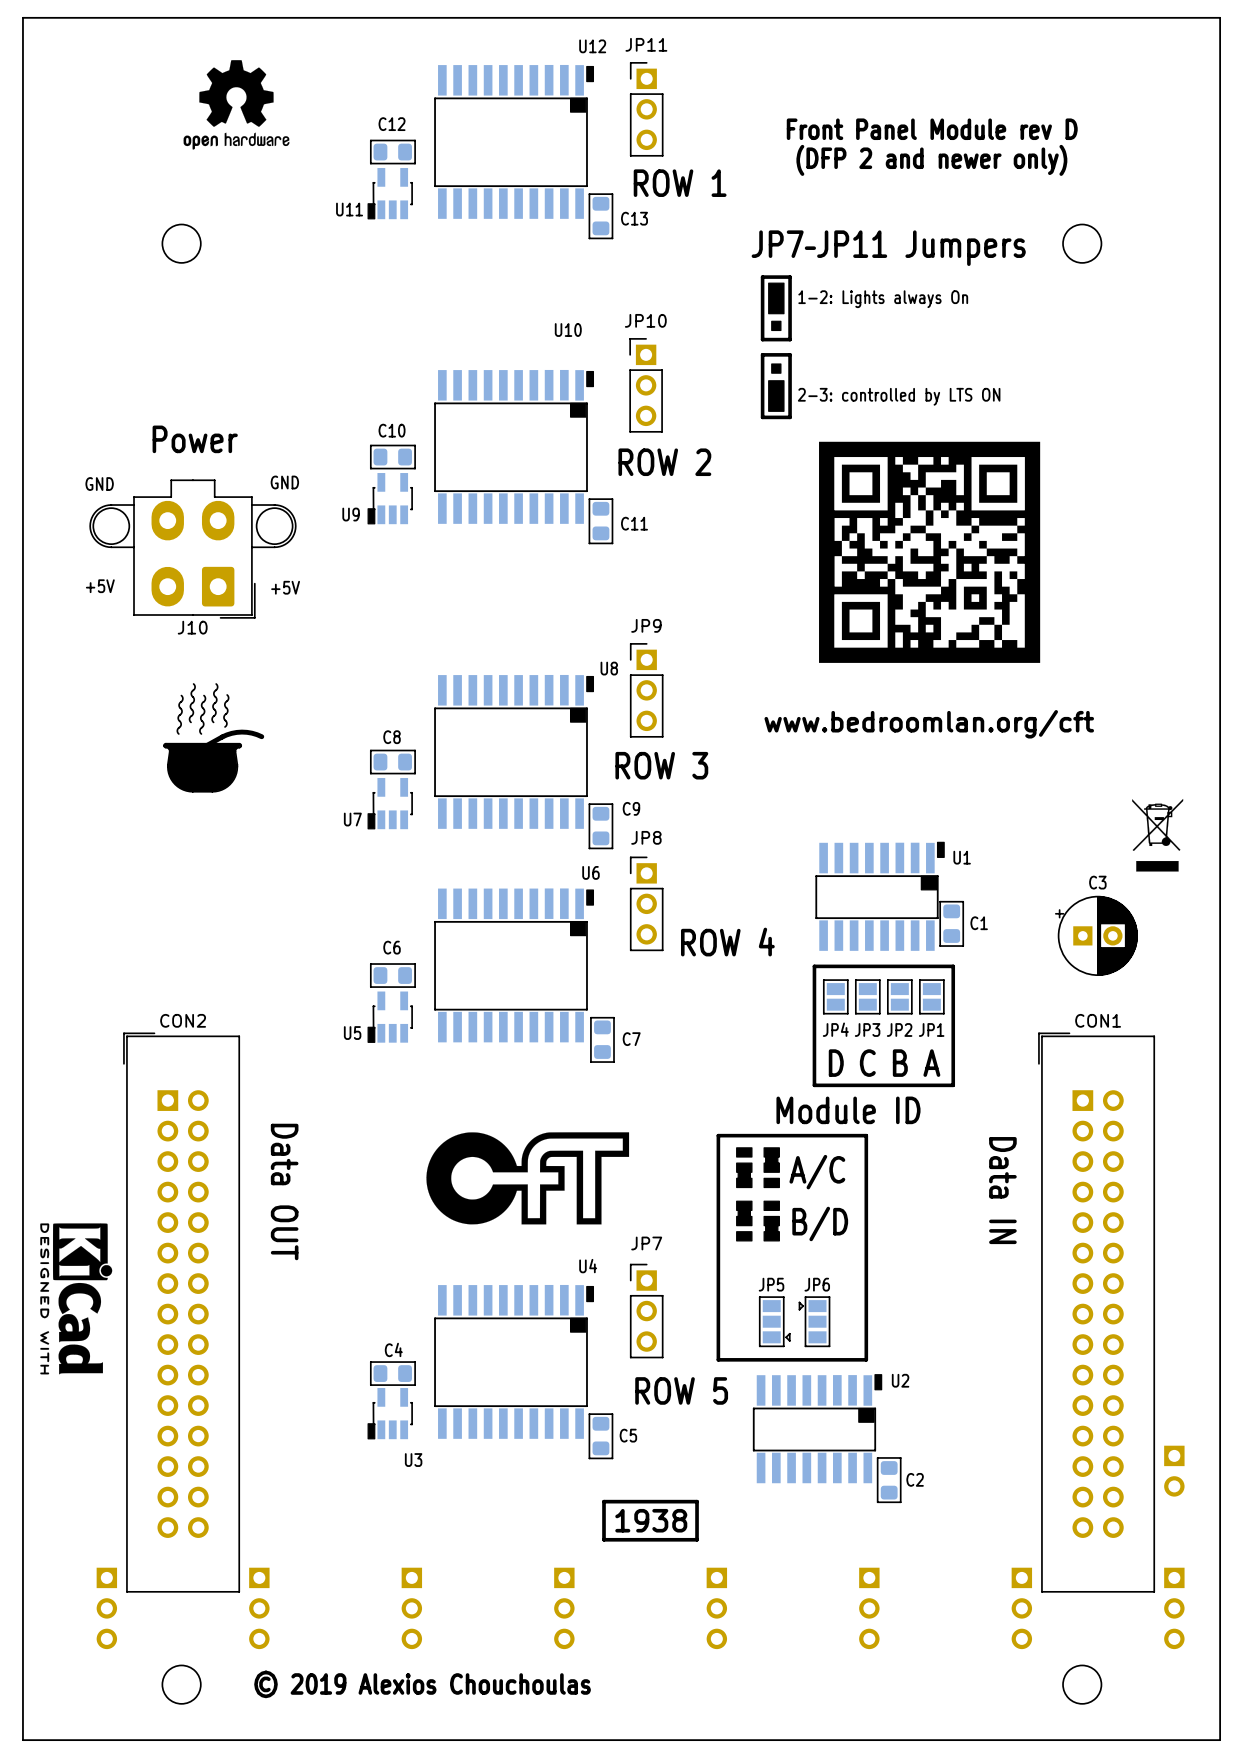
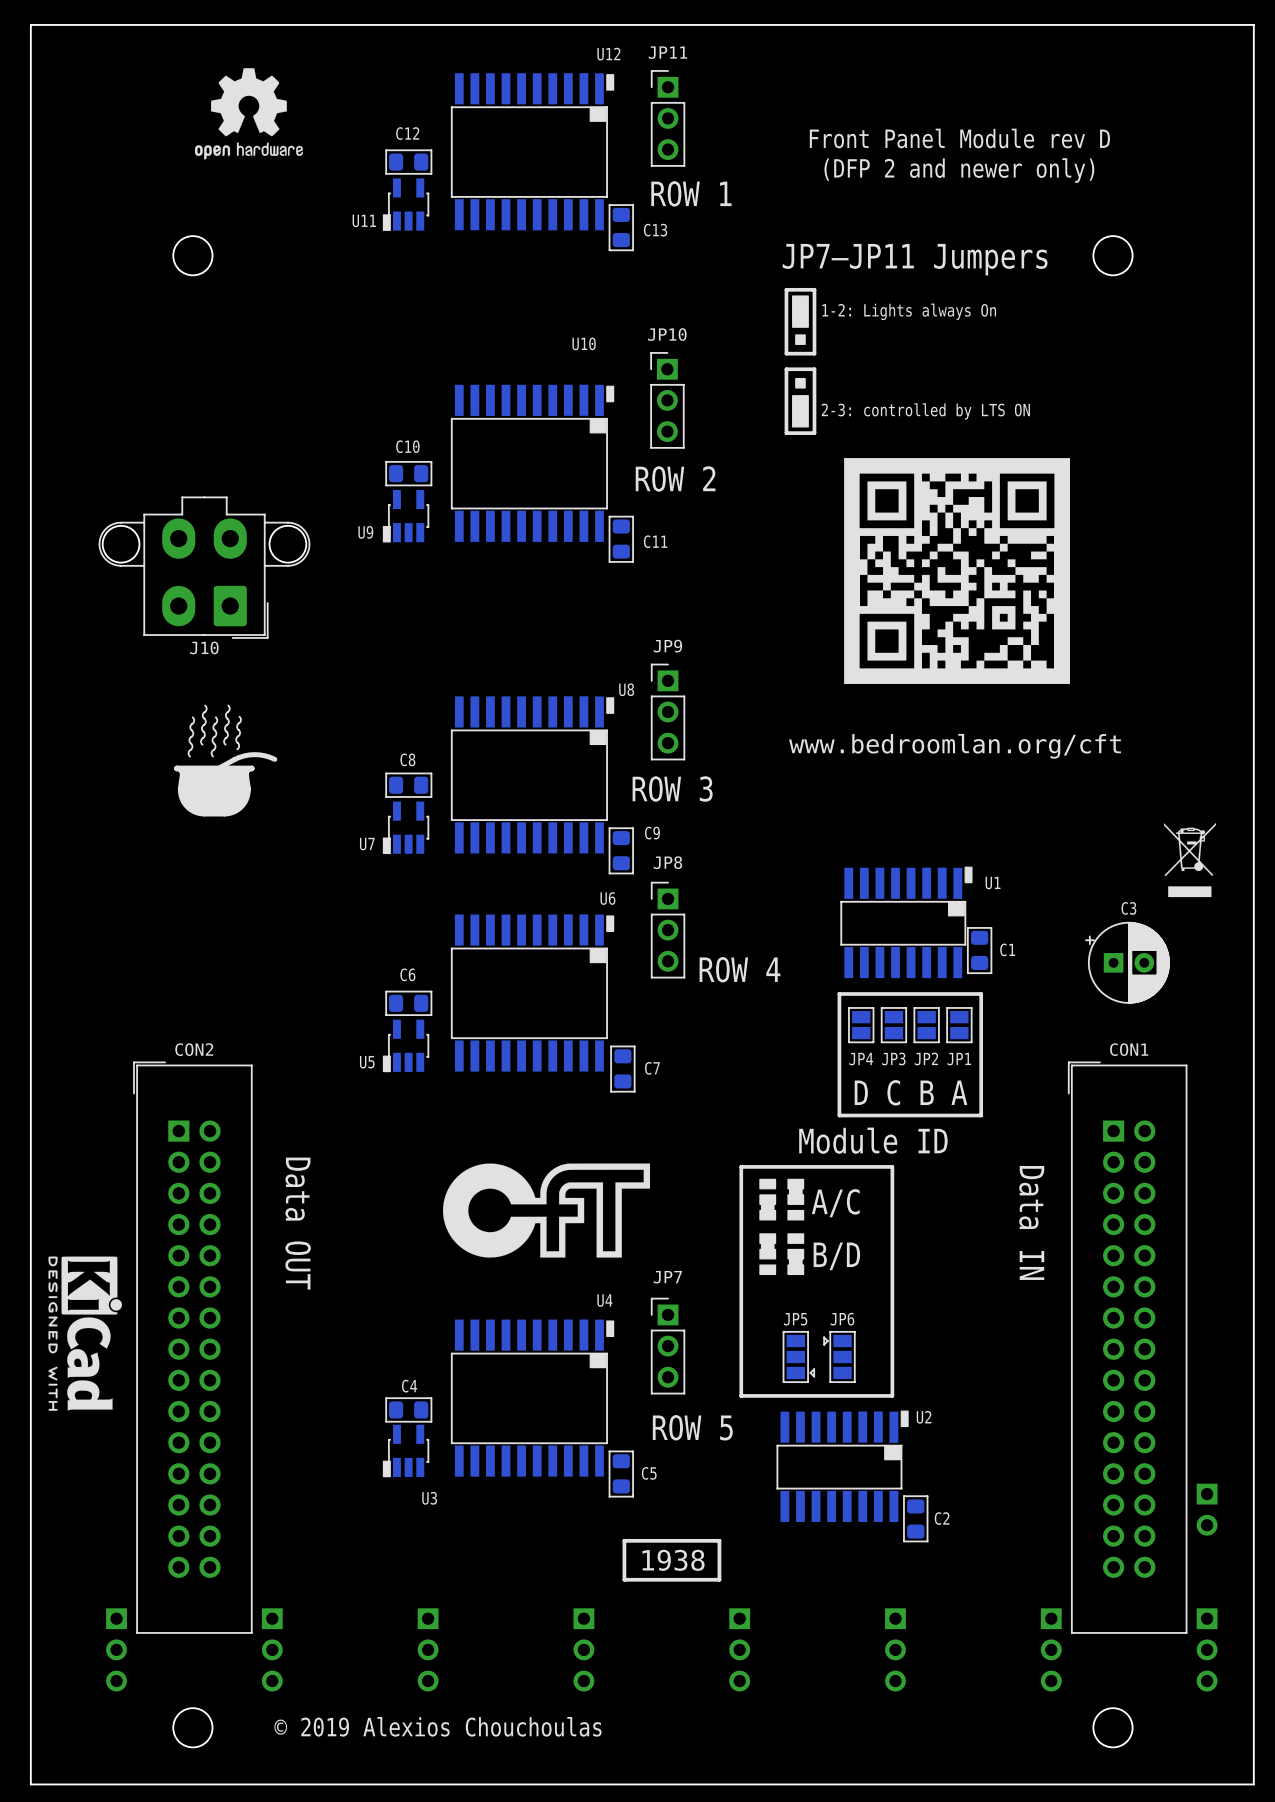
text: Power (195, 439) -> none
text: GND (284, 482) -> none
text: GND (99, 484) -> none
text: +5V (100, 586) -> none
text: +5V (285, 587) -> none

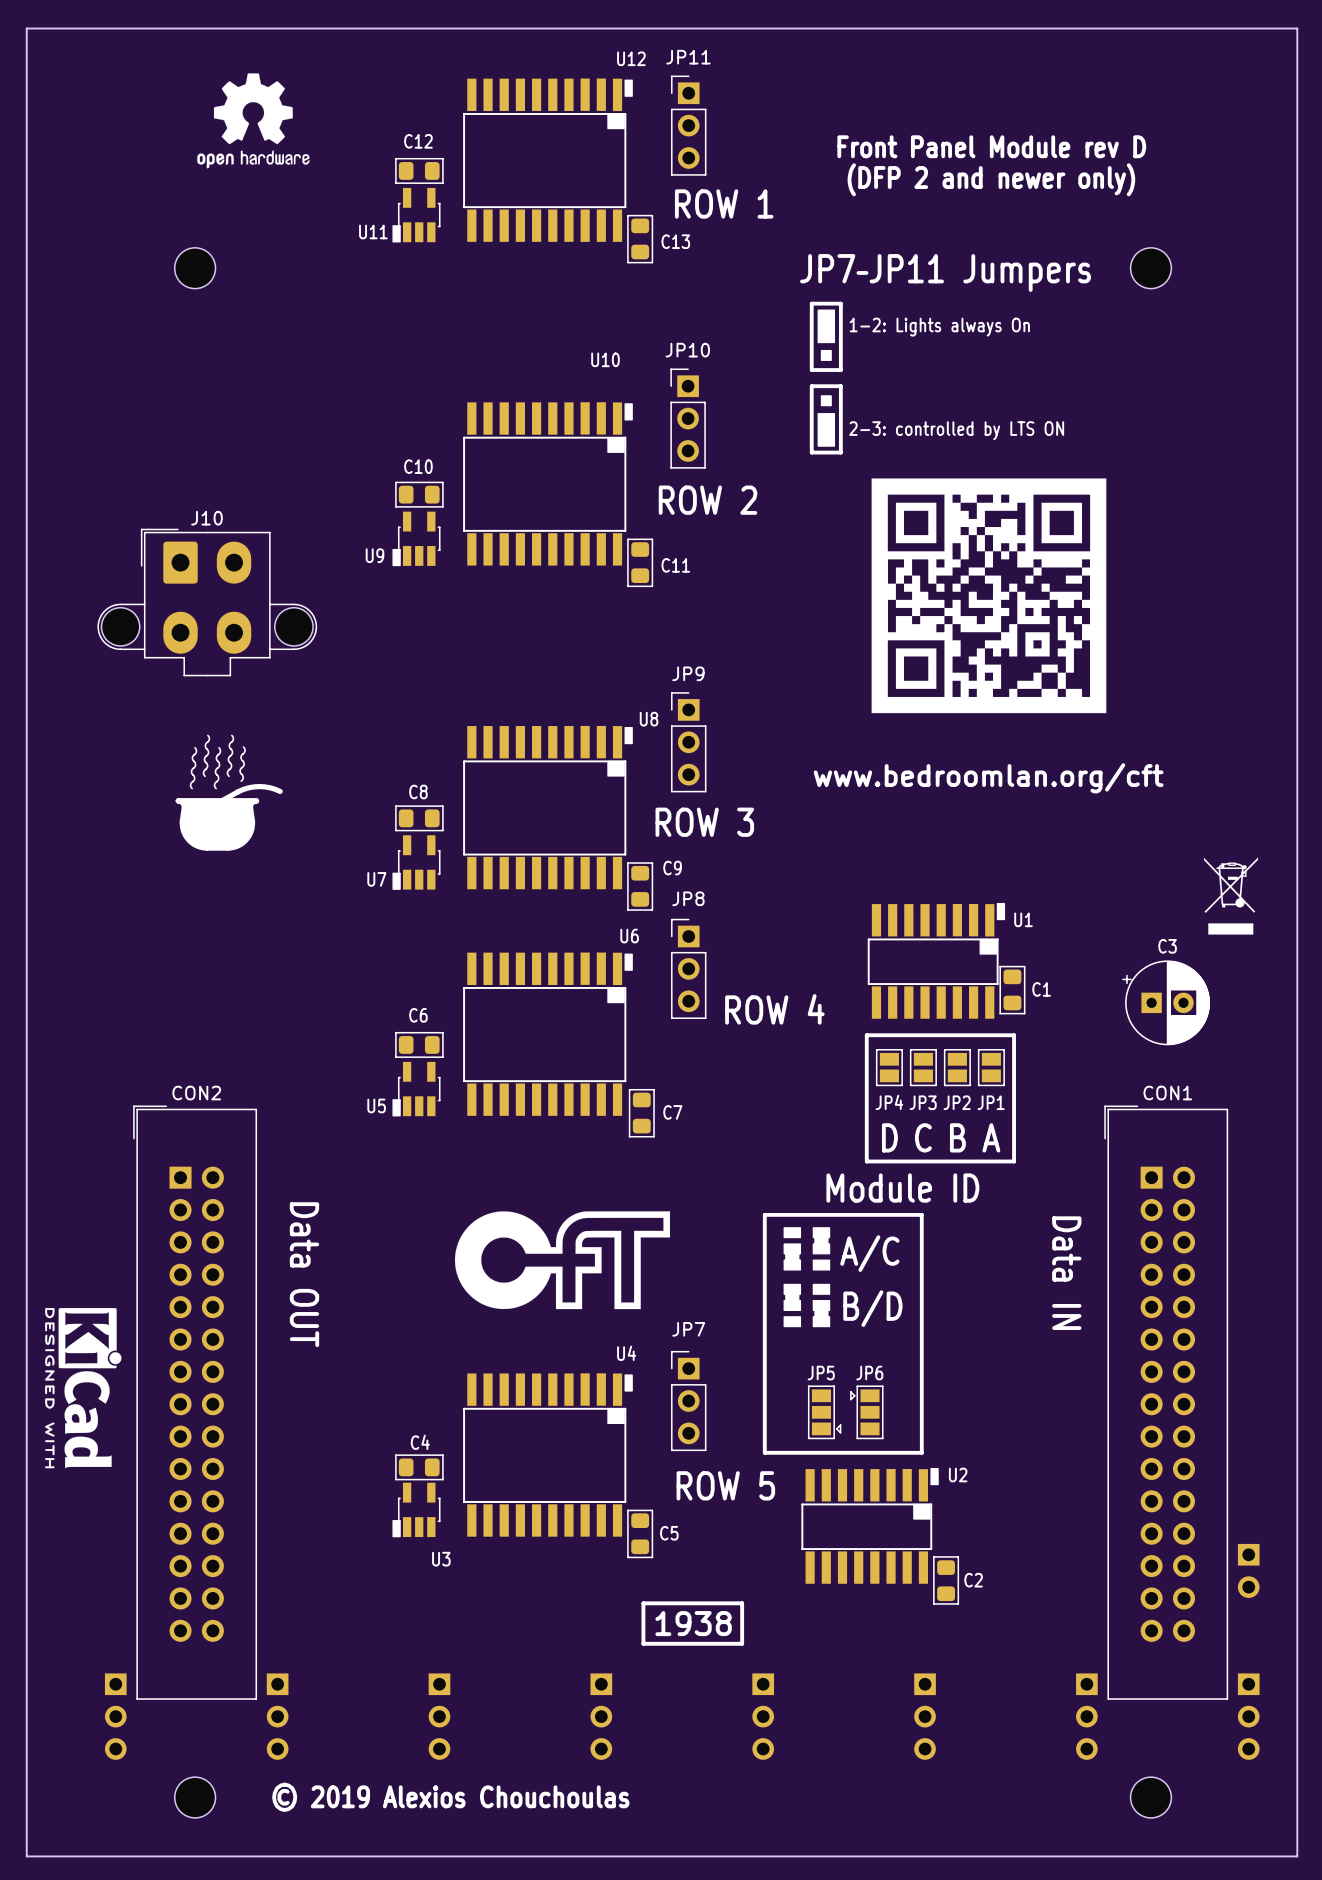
J10 rotation: 0° (204, 567) -> 180° (207, 602)

